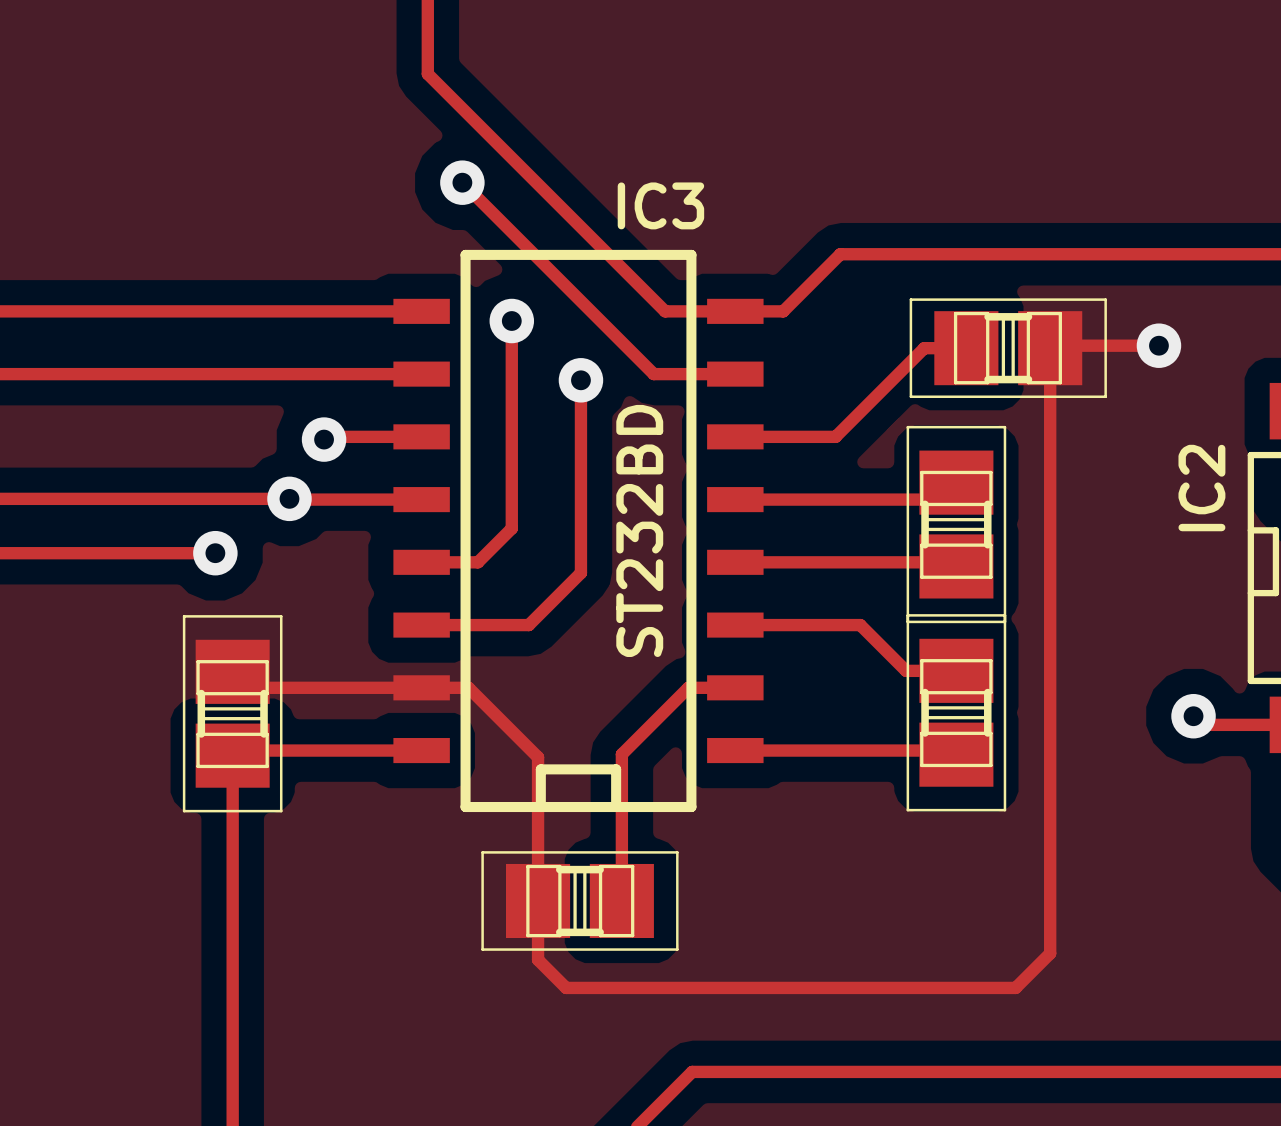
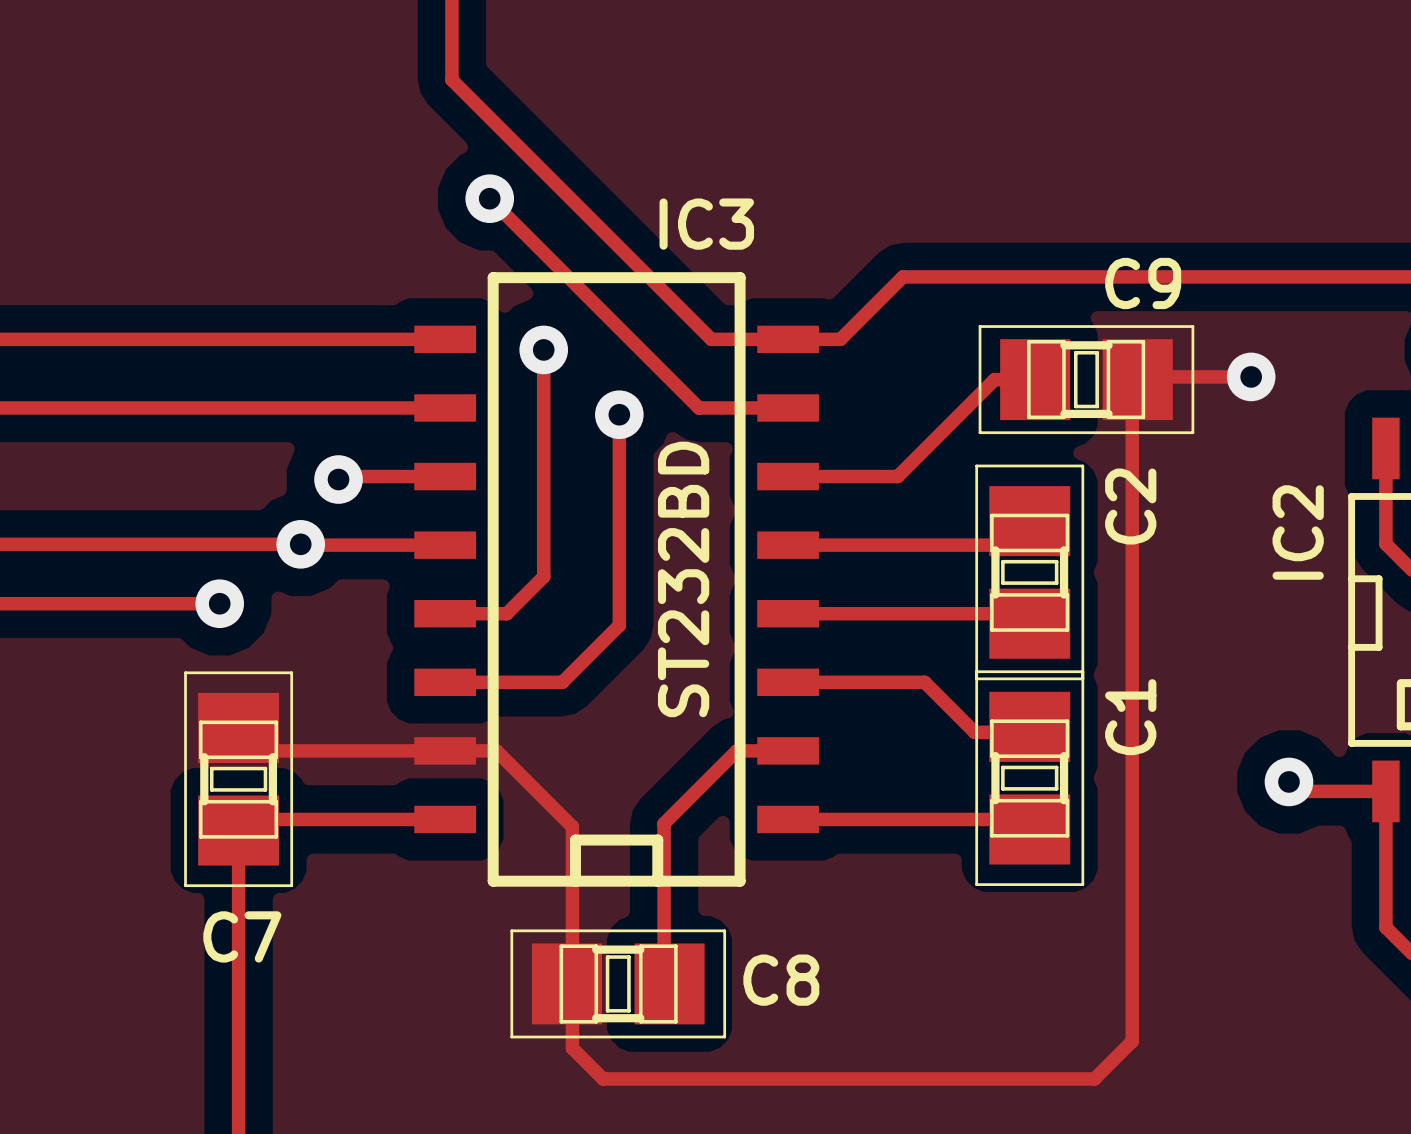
part: (1008, 348) -> none
C9: none -> (1086, 379)
part: (956, 524) -> none
C2: none -> (1029, 572)
part: (956, 712) -> none
C1: none -> (1029, 778)
part: (232, 713) -> none
C7: none -> (238, 779)
part: (579, 900) -> none
C8: none -> (618, 983)

